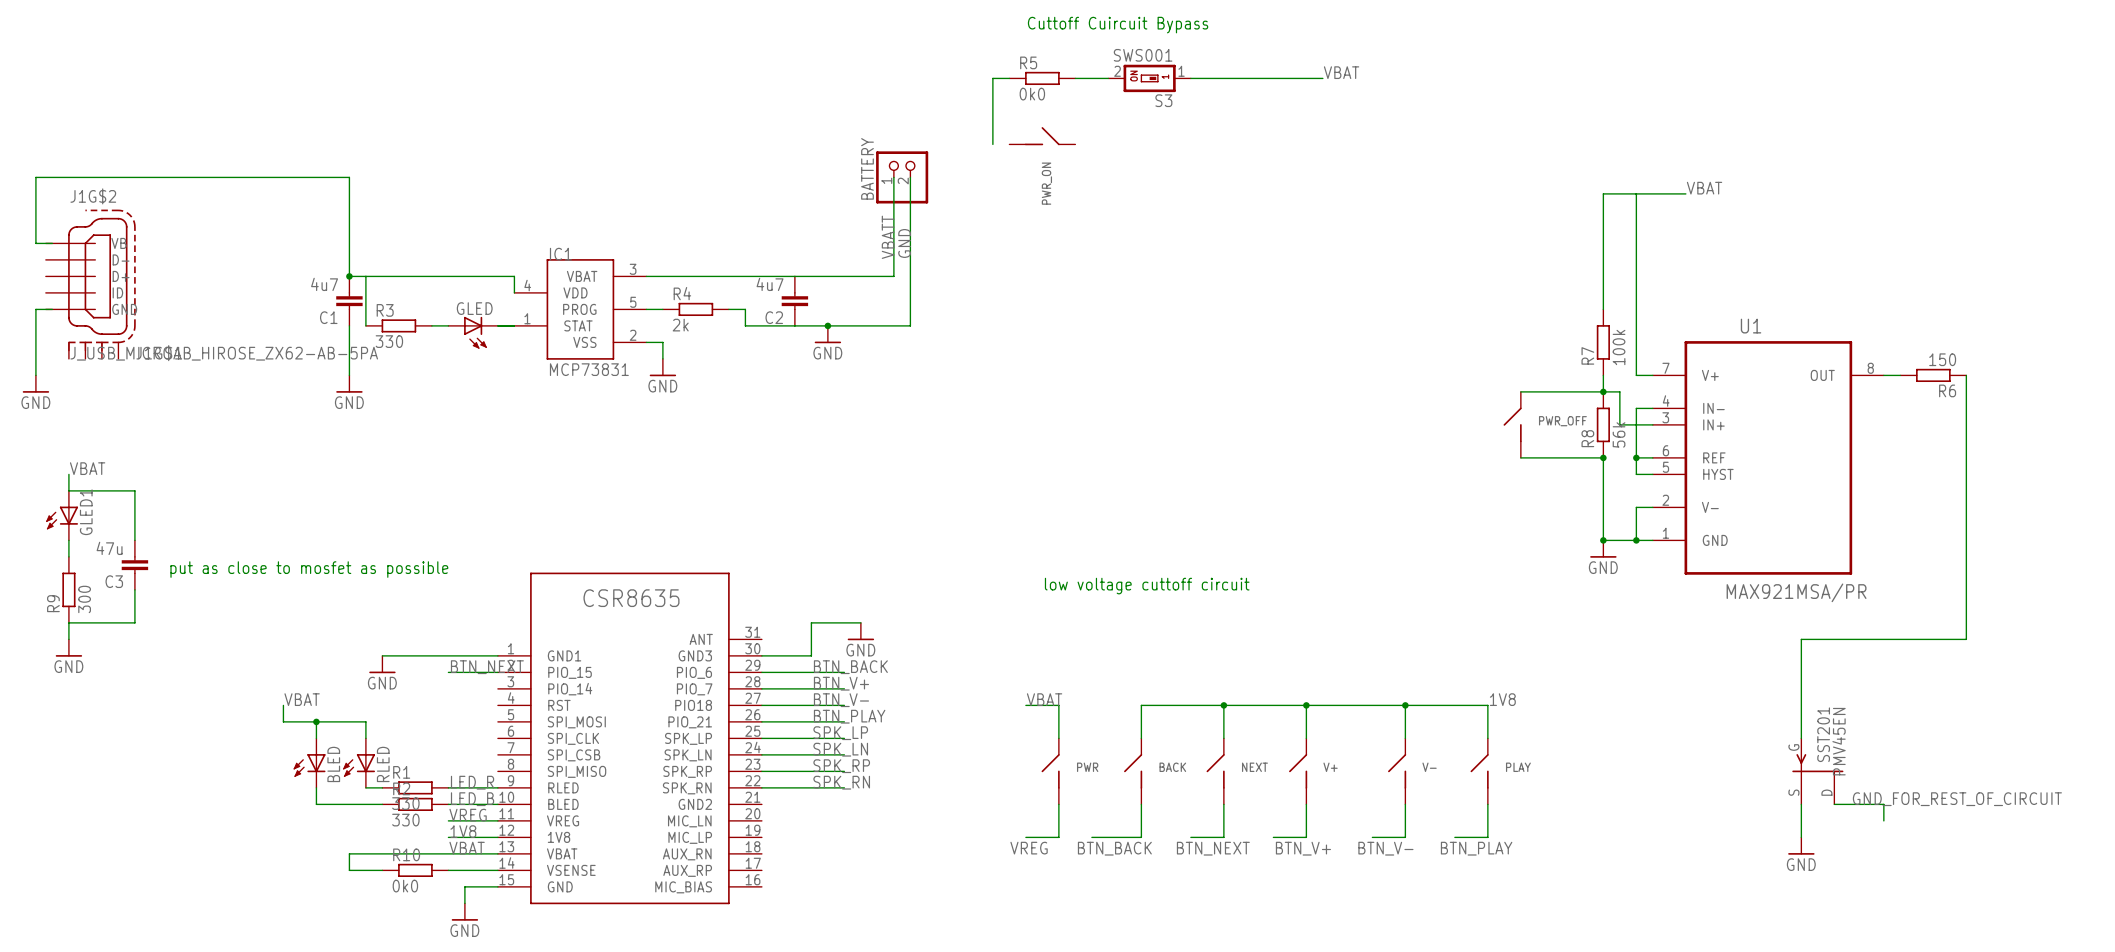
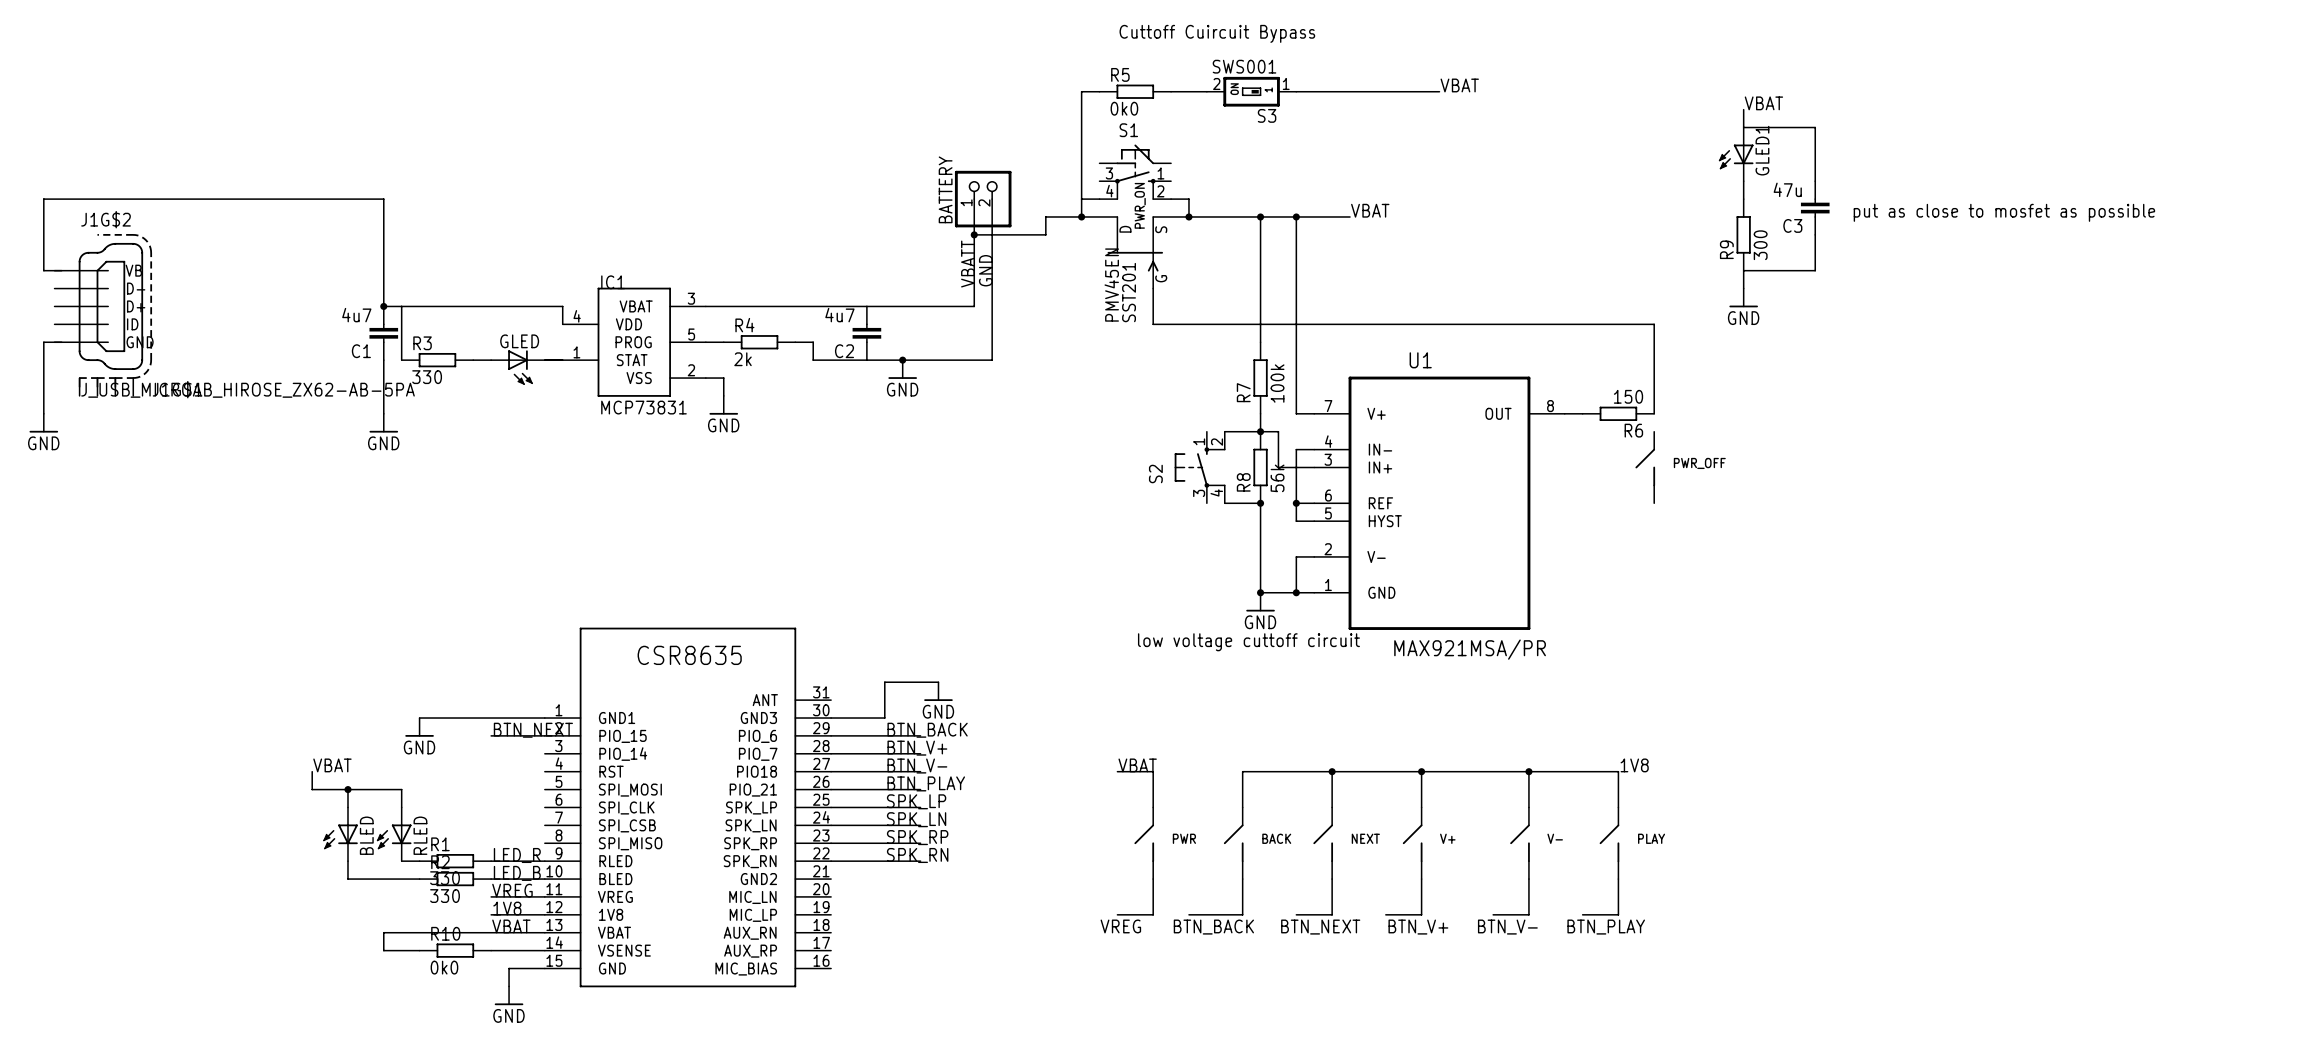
wire: none -> (1743, 109) (1743, 127) (1815, 127) (1815, 181)
wire: none -> (1081, 163) (1081, 216)
S1: none -> (1135, 174)
wire: none -> (1743, 181) (1743, 199)
wire: none -> (1081, 199) (1099, 199)
wire: none -> (1171, 199) (1188, 199) (1188, 216)
label: none -> VBAT (1370, 210)
label position: VBAT (1704, 188) -> VBAT (1763, 103)
text: none -> put as close to mosfet as possible (2004, 212)
junction: none -> (1081, 216)
wire: none -> (1117, 216) (1045, 216) (1045, 234) (974, 234)
wire: none -> (1153, 216) (1350, 216)
junction: none -> (1188, 216)
wire: none -> (1260, 216) (1260, 342)
junction: none -> (1260, 216)
wire: none -> (1296, 216) (1296, 413) (1314, 413)
junction: none -> (1296, 216)
wire: (1636, 193) (1636, 375) (1652, 375) -> none
wire: (1685, 193) (1603, 193) (1603, 243) -> (1815, 234) (1815, 270) (1743, 270)
junction: none -> (974, 234)
wire: none -> (1153, 288) (1153, 324) (1654, 324) (1654, 413)
wire: (1603, 259) (1603, 309) -> none
power symbol: none -> GND (1743, 297)
R7 position: (1603, 342) -> (1260, 378)
wire: none -> (1260, 413) (1260, 431)
wire: none -> (1564, 413) (1582, 413)
wire: (1603, 375) (1603, 391) -> none
wire: (1883, 375) (1900, 375) -> none
R6 position: (1933, 375) -> (1618, 413)
wire: (1966, 375) (1966, 639) (1801, 639) (1801, 738) -> none
wire: none -> (1224, 431) (1278, 431) (1278, 467) (1314, 467)
junction: none -> (1260, 431)
wire: (1520, 391) (1619, 391) (1619, 424) (1652, 424) -> none
junction: (1603, 391) -> none
wire: none -> (1314, 449) (1296, 449) (1296, 521) (1314, 521)
wire: (1652, 408) (1636, 408) (1636, 474) (1652, 474) -> none
S2: none -> (1199, 467)
R8 position: (1603, 424) -> (1260, 467)
wire: none -> (1224, 503) (1260, 503) (1260, 592) (1314, 592)
junction: none -> (1260, 503)
wire: none -> (1296, 503) (1314, 503)
junction: none -> (1296, 503)
wire: (1520, 457) (1603, 457) (1603, 540) (1652, 540) -> none
junction: (1603, 457) -> none
wire: (1636, 457) (1652, 457) -> none
junction: (1636, 457) -> none
U1 position: (1768, 457) -> (1439, 503)
label: VBAT (87, 468) -> none
wire: (68, 474) (68, 490) (134, 490) (134, 540) -> none
wire: none -> (1314, 556) (1296, 556) (1296, 592)
wire: (1652, 507) (1636, 507) (1636, 540) -> none
GLED1 position: (62, 515) -> (1736, 154)
wire: (68, 540) (68, 556) -> none
junction: none -> (1260, 592)
junction: none -> (1296, 592)
junction: (1603, 540) -> none
junction: (1636, 540) -> none
power symbol: none -> GND (1260, 602)
power symbol: GND (1603, 549) -> none
C3 position: (134, 565) -> (1815, 208)
text: put as close to mosfet as possible (309, 569) -> none
R9 position: (68, 589) -> (1743, 234)
wire: (134, 589) (134, 622) (68, 622) (68, 639) -> none
power symbol: GND (68, 648) -> none
PMV45EN value position: SST201 (1823, 734) -> SST201 (1129, 292)
PMV45EN symbol: [1792, 738, 1844, 805] -> [1107, 216, 1164, 289]
PMV45EN name position: PMV45EN (1839, 741) -> PMV45EN (1111, 285)
label: GND_FOR_REST_OF_CIRCUIT (1957, 799) -> none
wire: (1801, 804) (1801, 837) -> none
wire: (1834, 804) (1883, 804) (1883, 820) -> none
power symbol: GND (1801, 846) -> none

